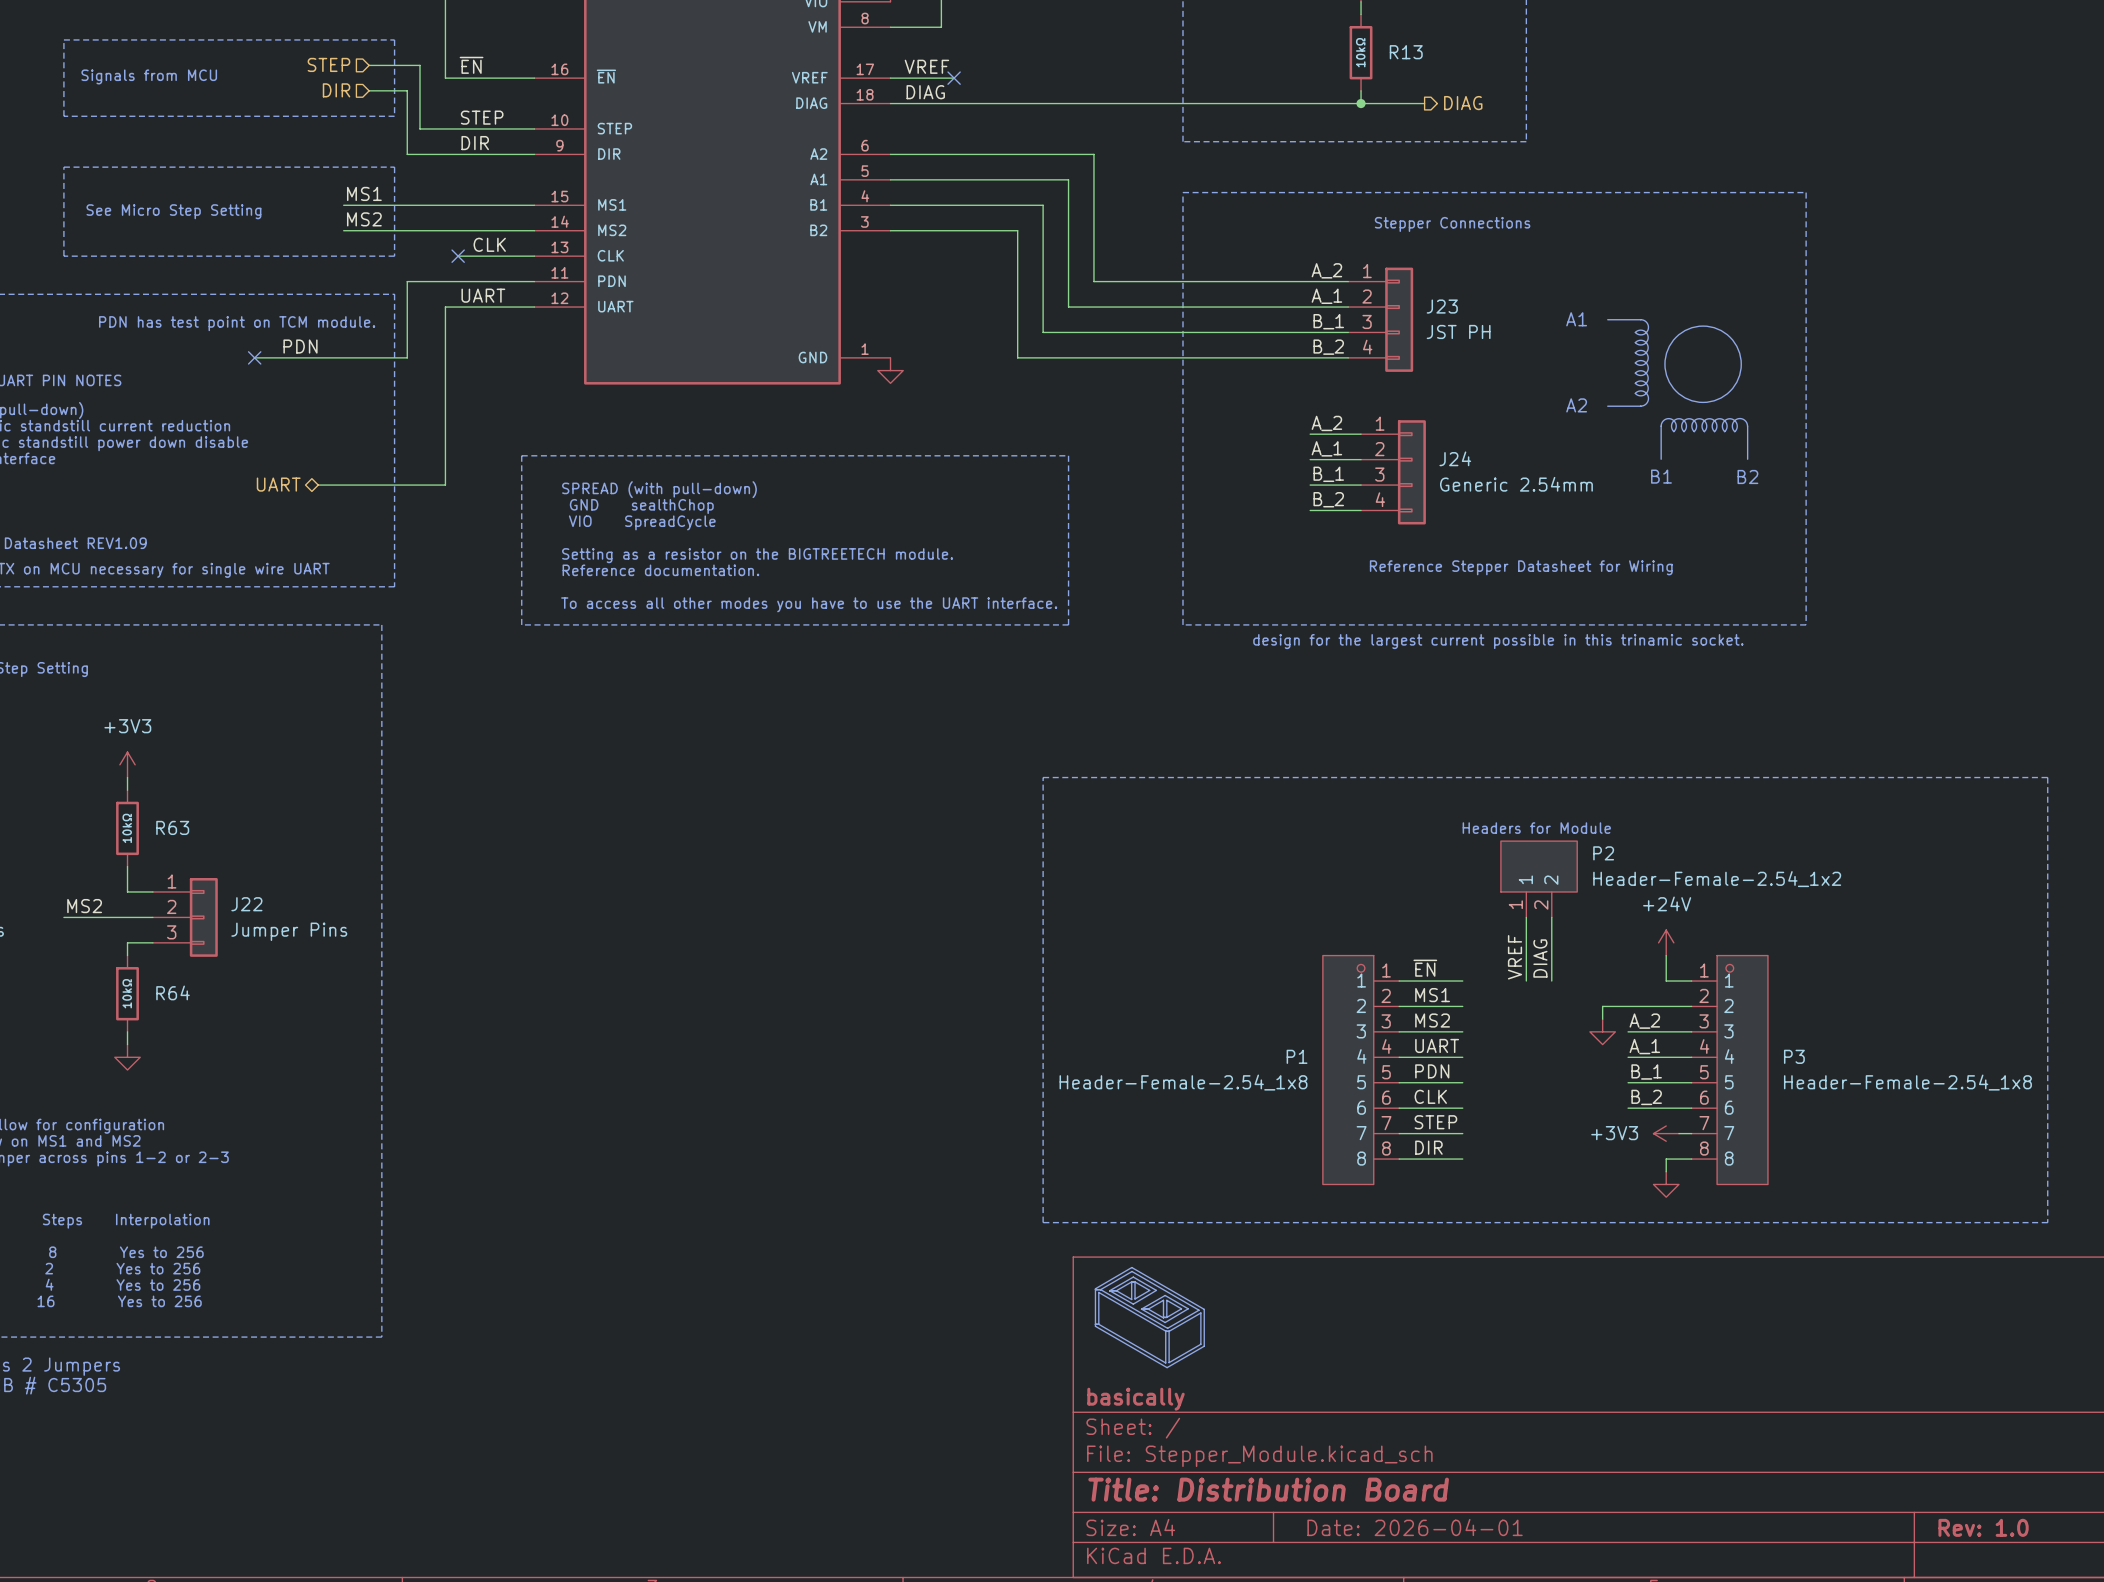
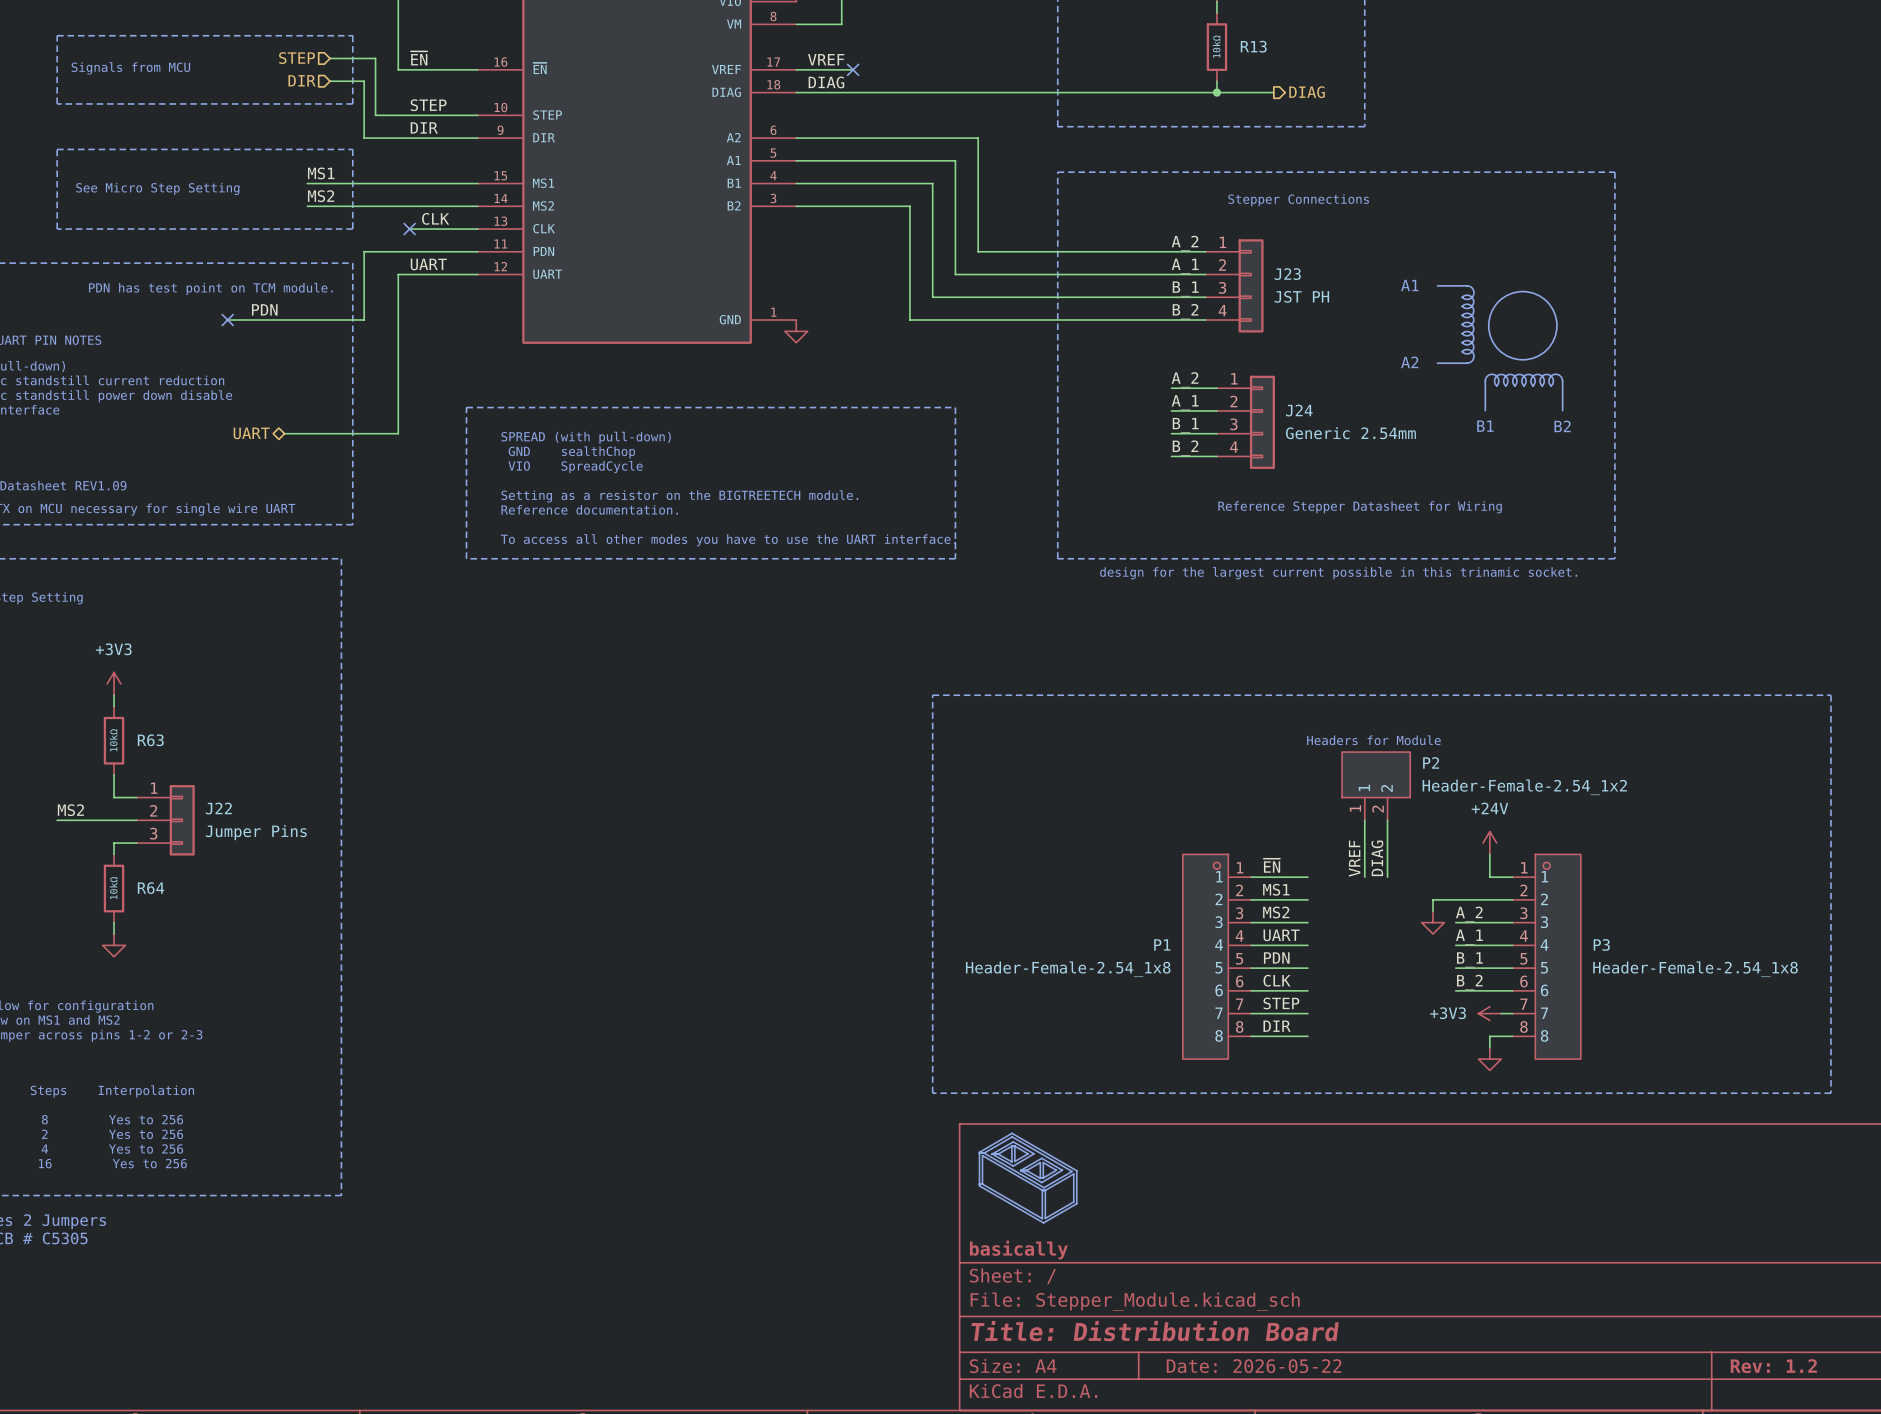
title block: Date: 2026-04-01 (1415, 1527) -> Date: 2026-05-22 (1254, 1366)
title block: Rev: 1.0 (1983, 1527) -> Rev: 1.2 (1773, 1366)

